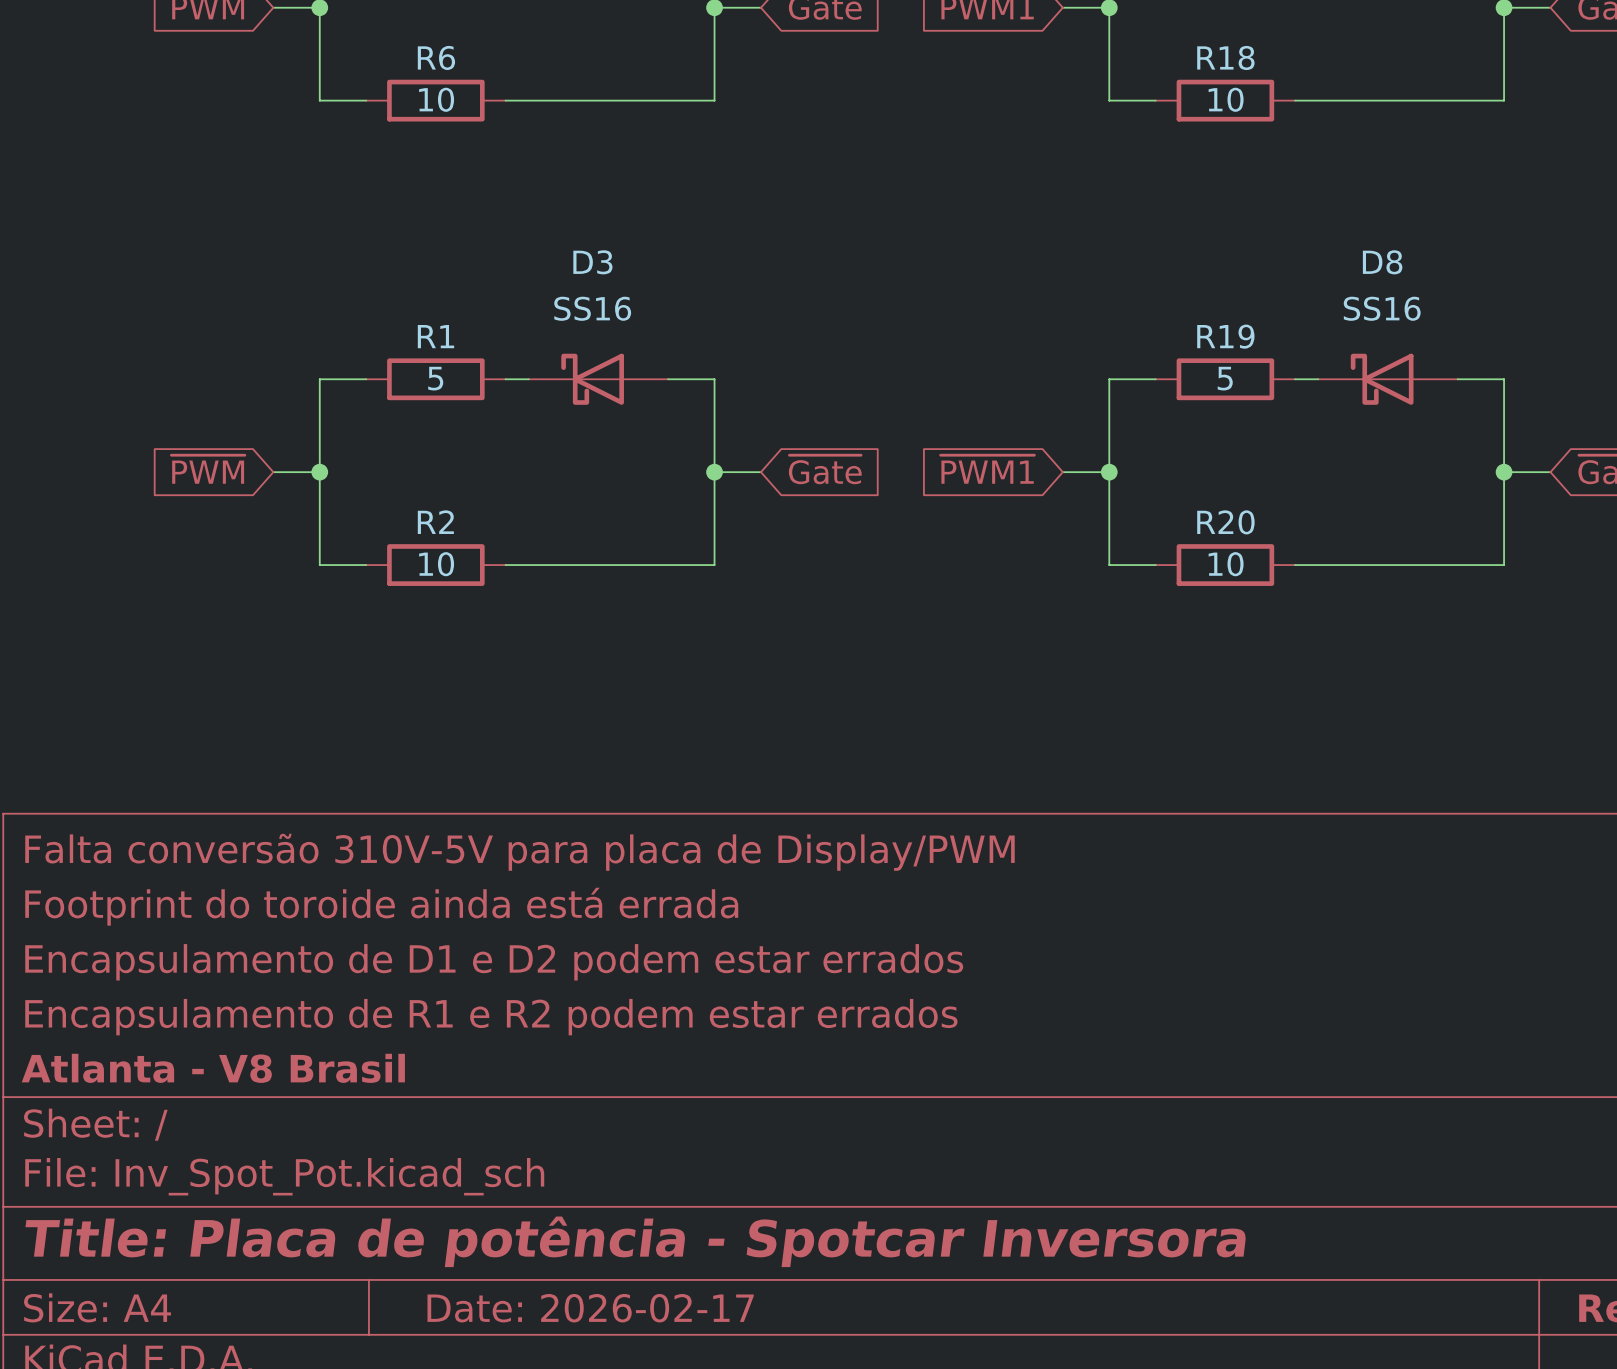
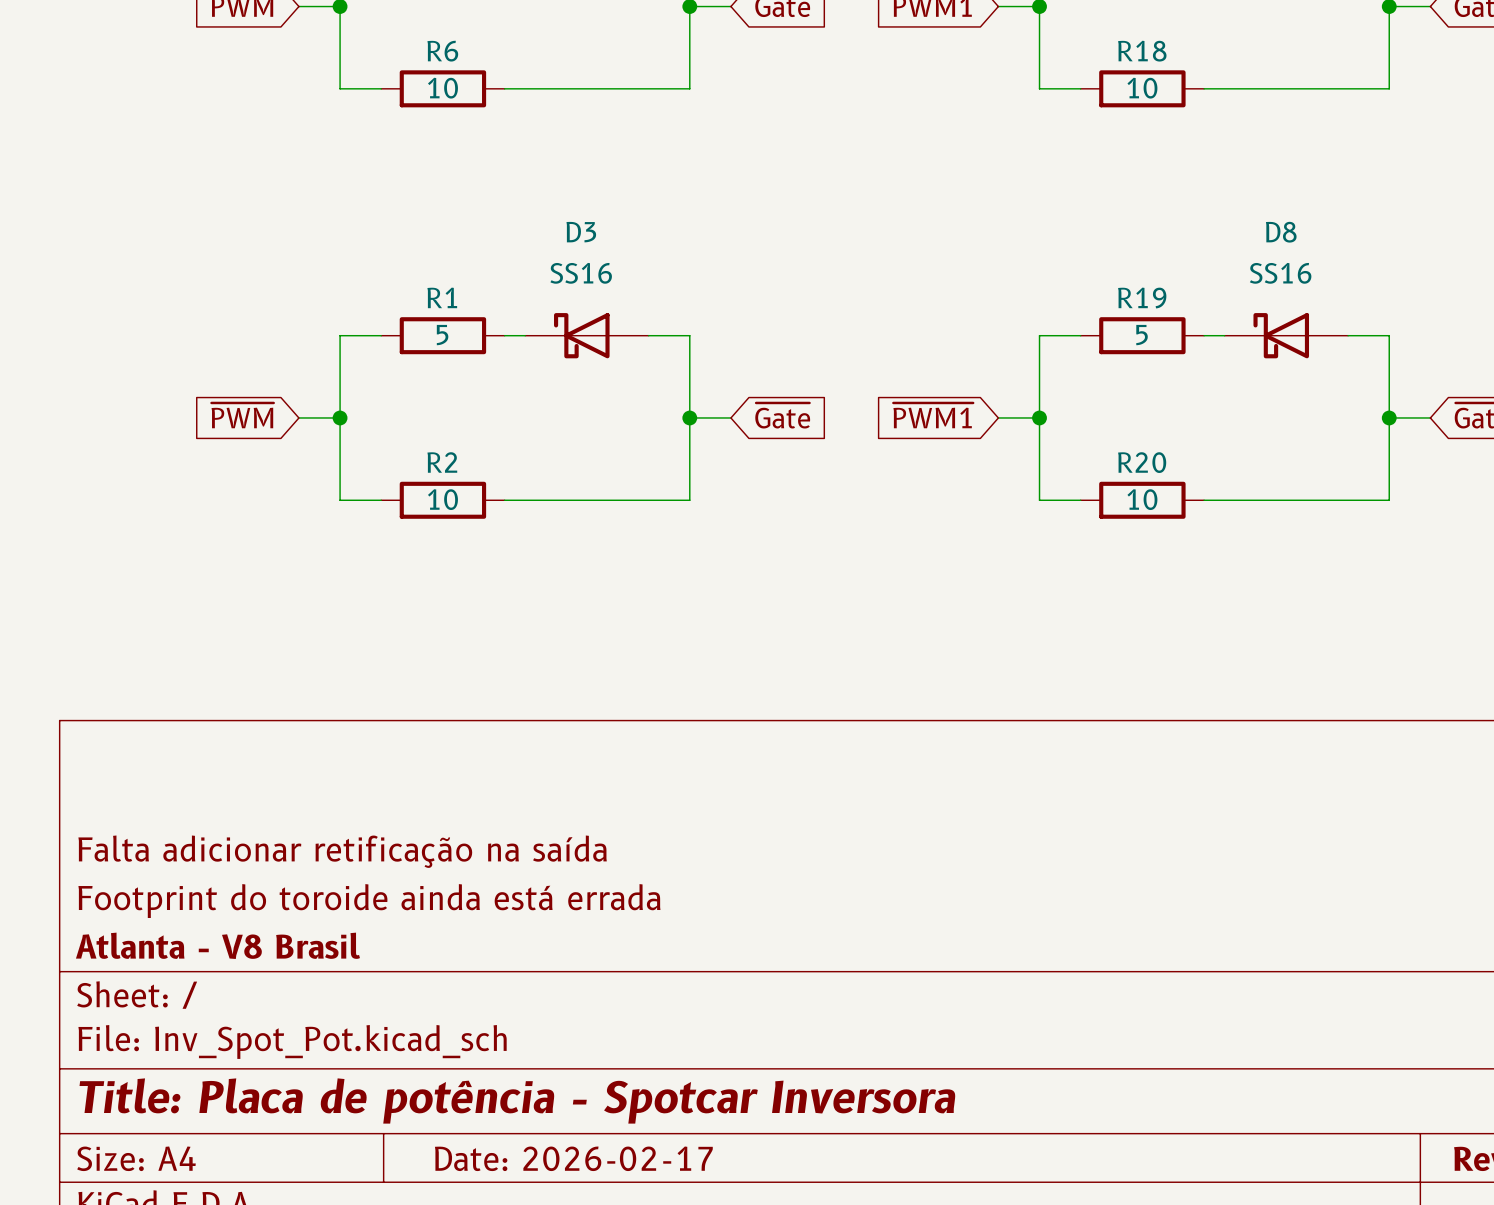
title block: Falta conversão 310V-5V para placa de Display/PWM (519, 852) -> none
title block: Footprint do toroide ainda está errada (381, 906) -> none
title block: Encapsulamento de D1 e D2 podem estar errados (494, 962) -> Falta adicionar retificação na saída (342, 851)
title block: Encapsulamento de R1 e R2 podem estar errados (491, 1017) -> Footprint do toroide ainda está errada (369, 901)

